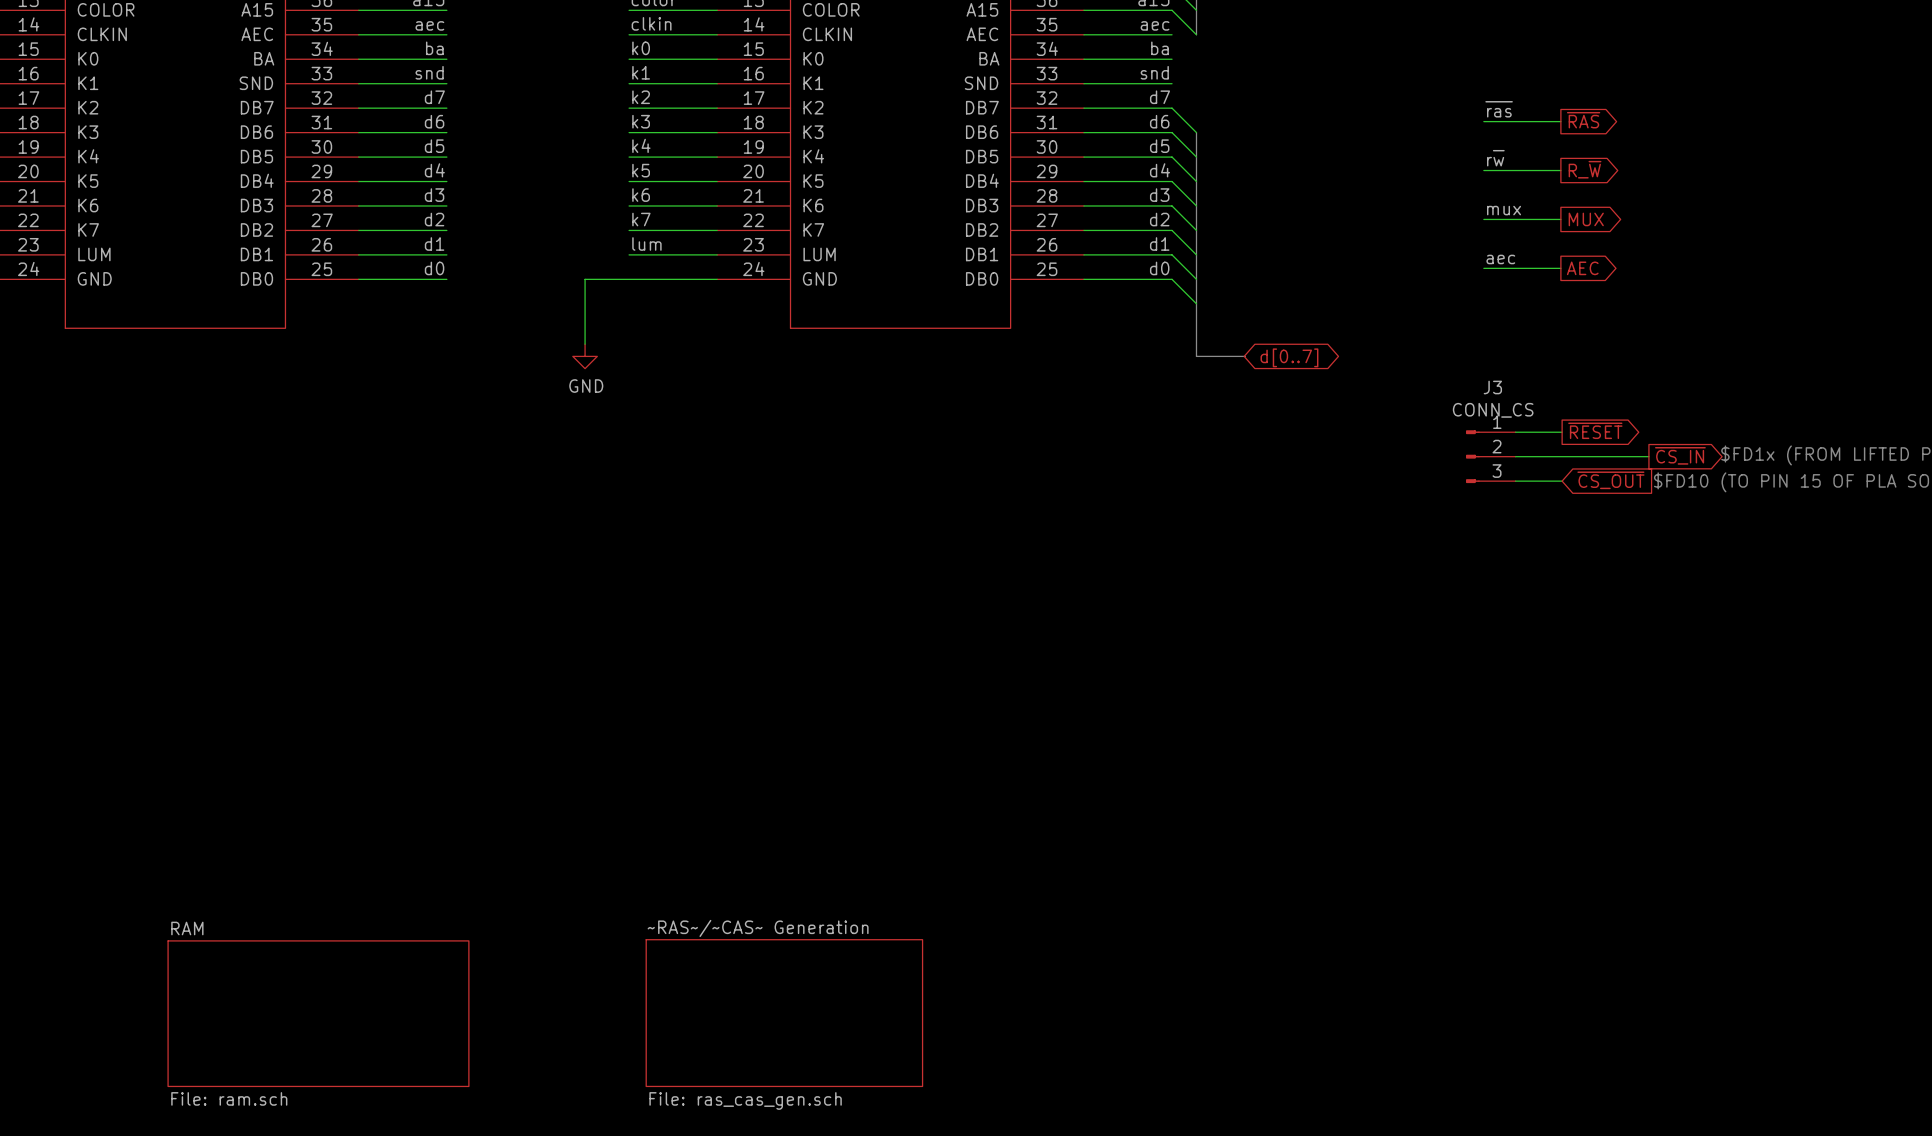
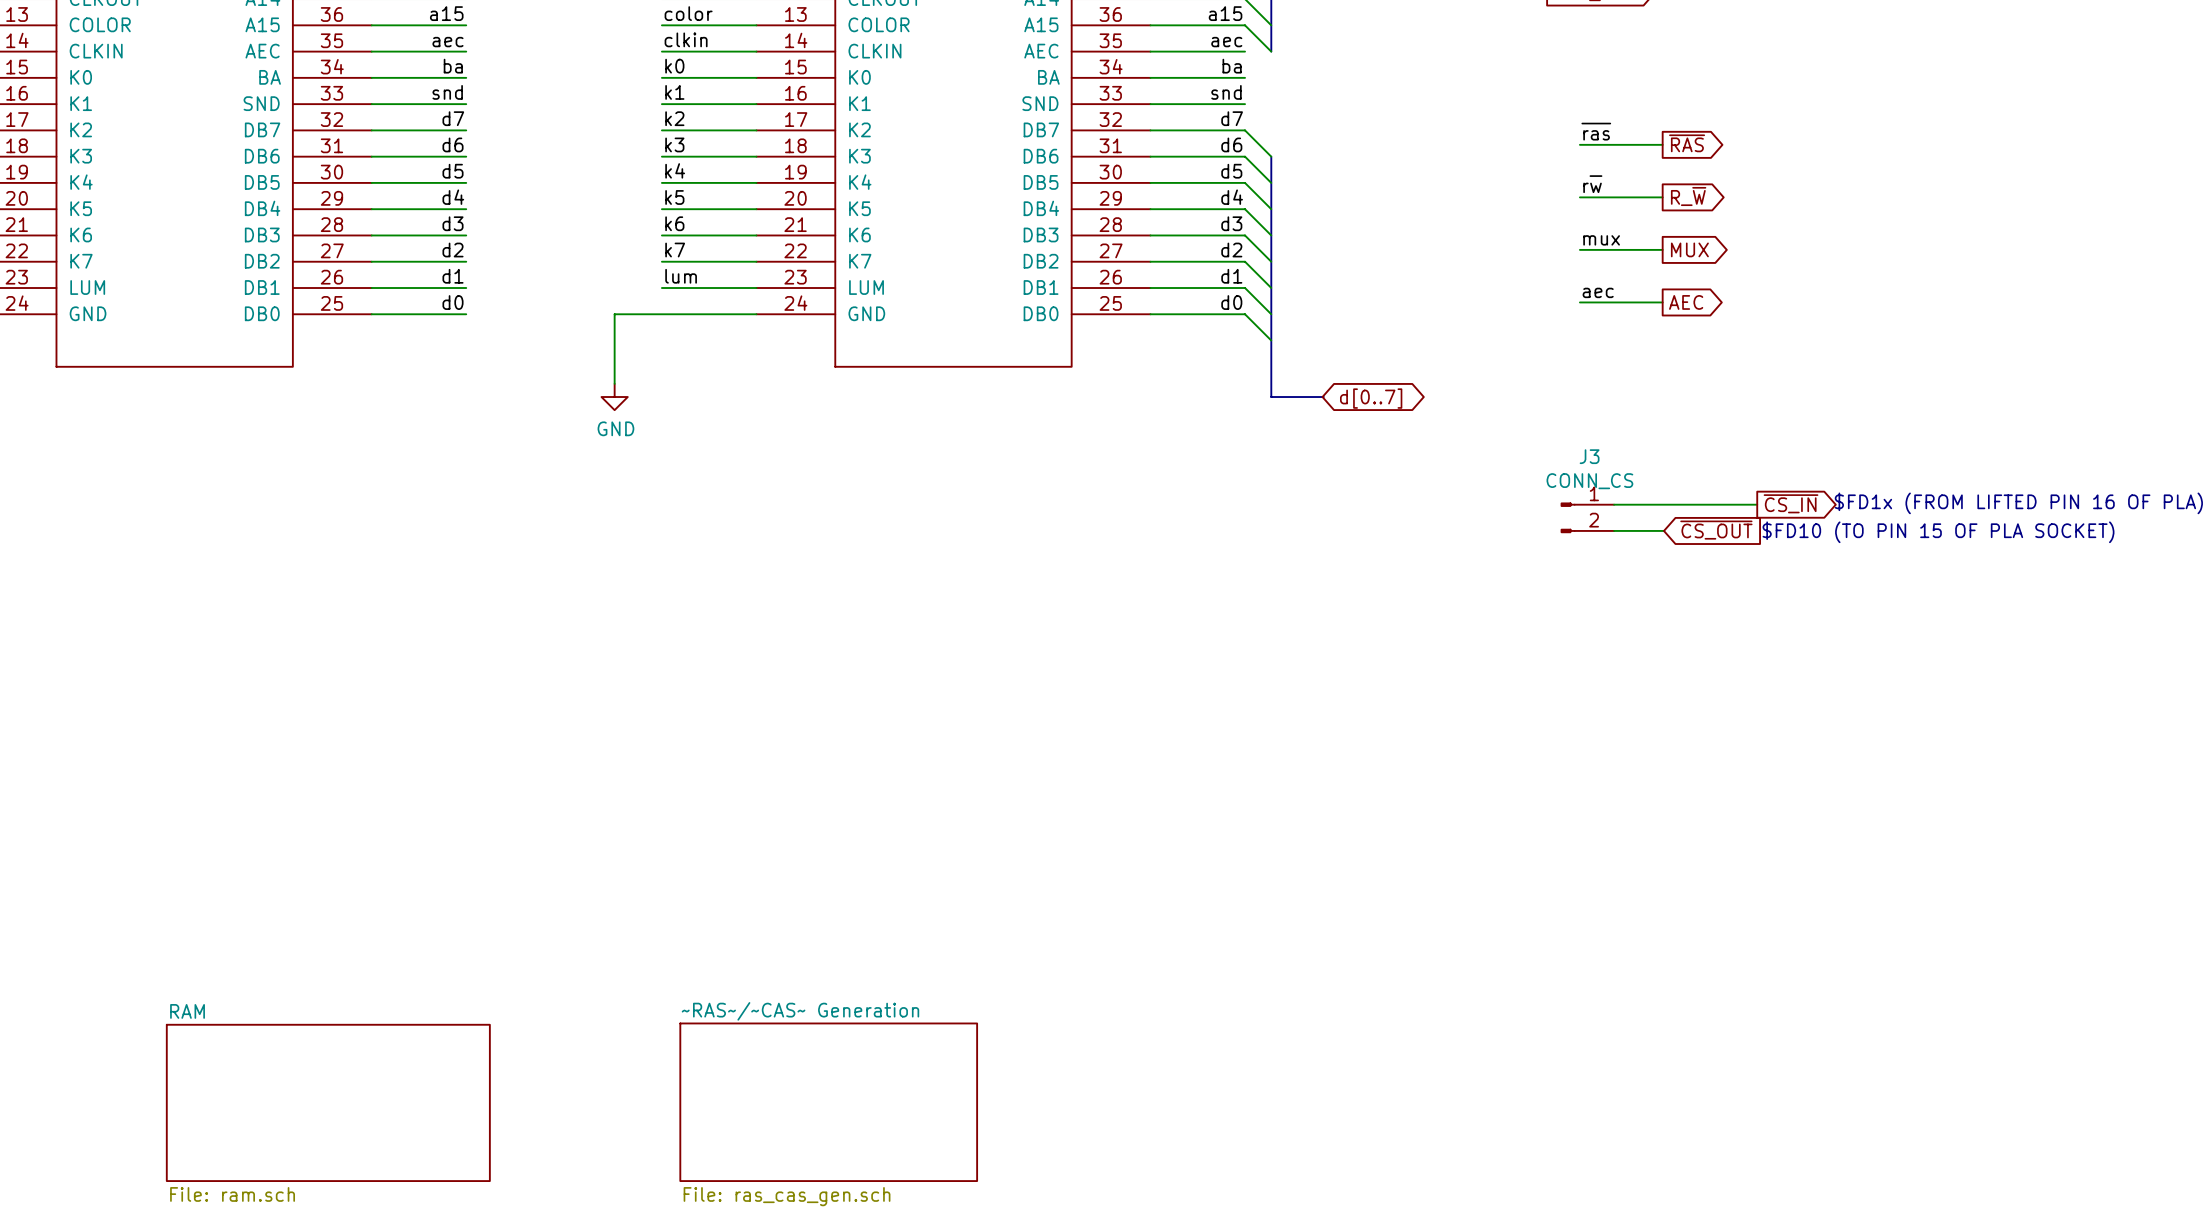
J3 symbol: [1466, 430, 1516, 484] -> [1560, 502, 1615, 534]
global label: ~{RESET} (1595, 430) -> none
wire: (1515, 432) (1562, 432) -> none

